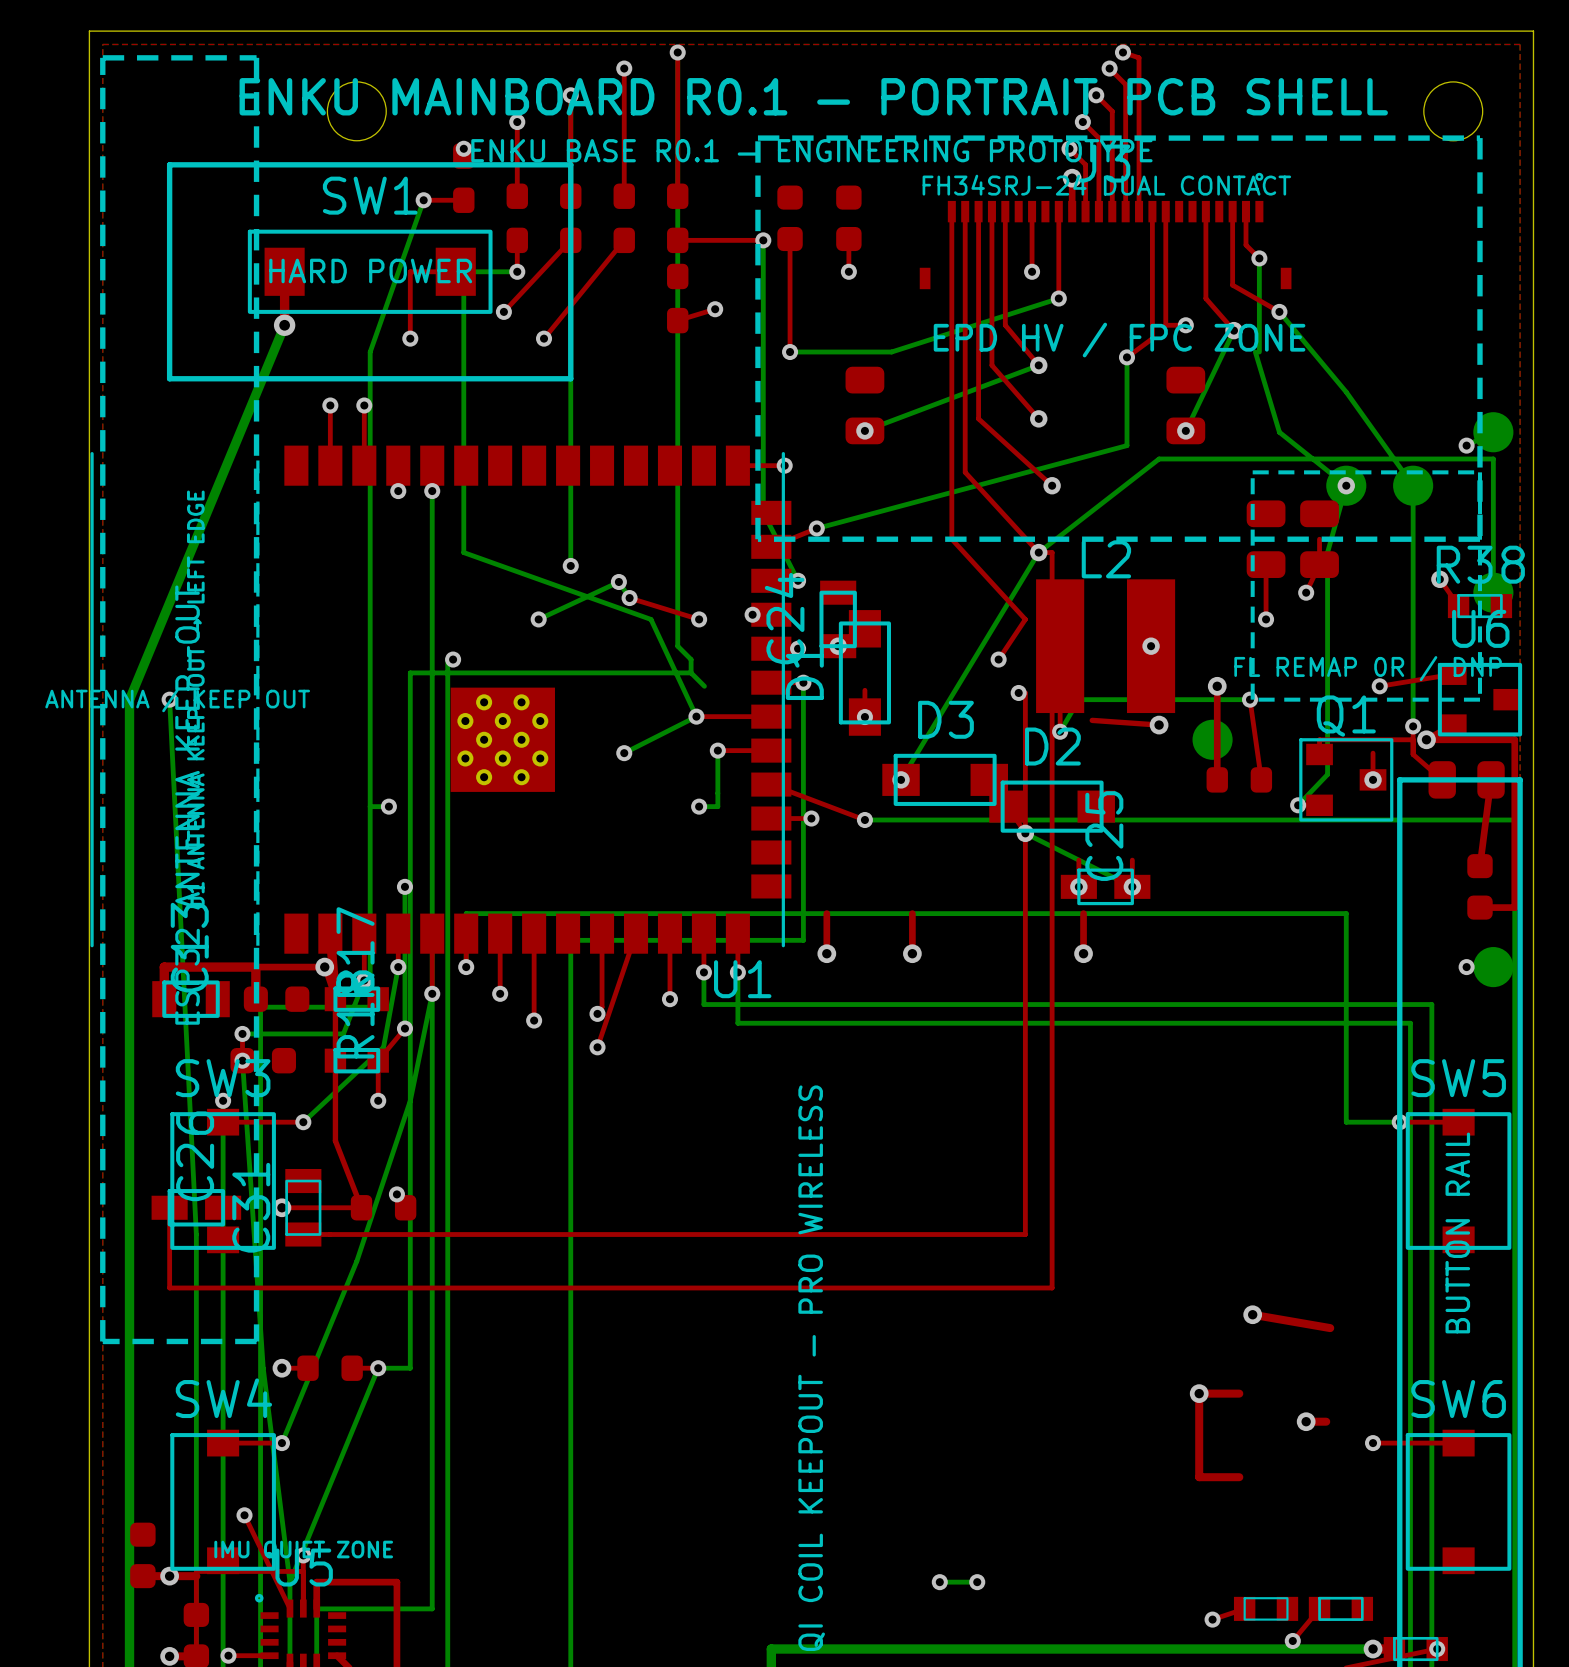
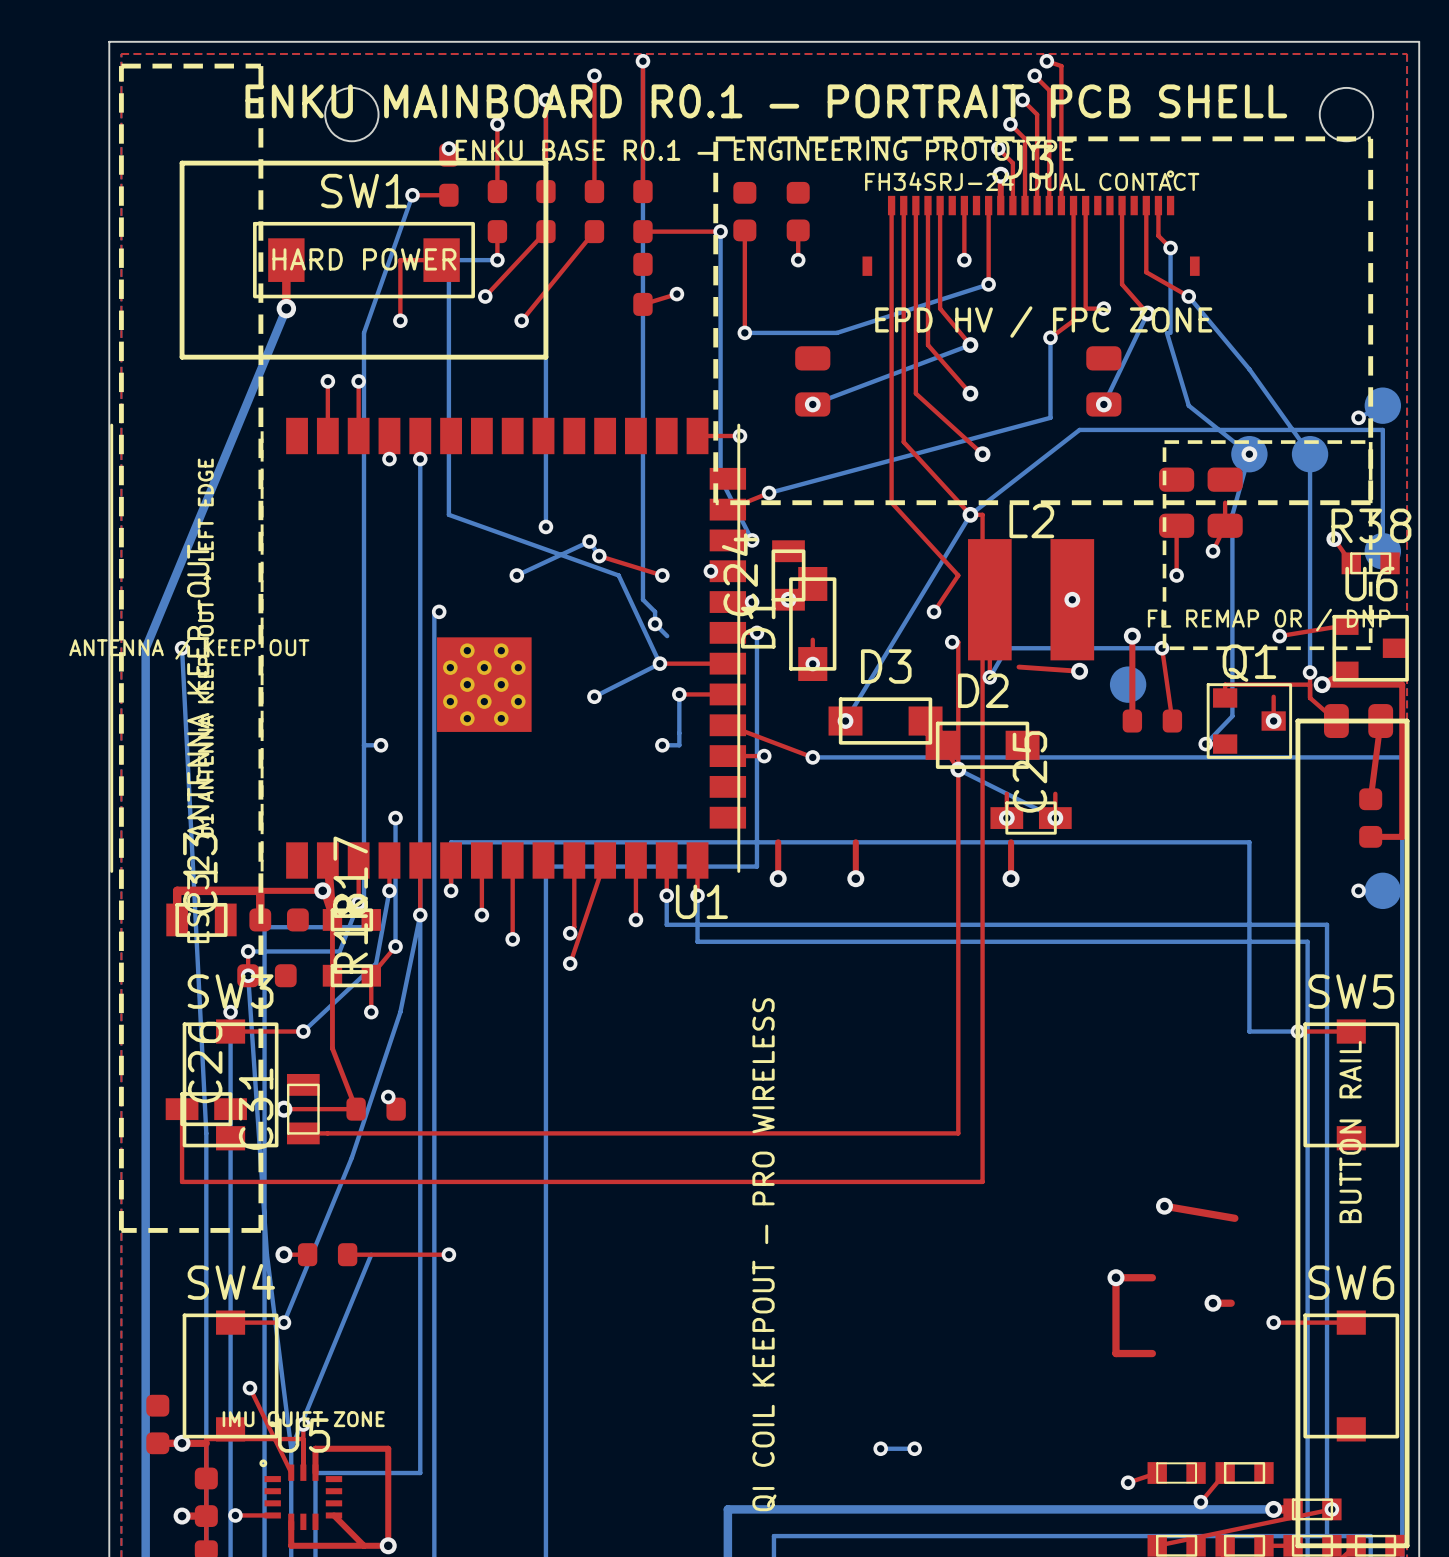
bottom track: (691, 672) (410, 672) (410, 1368) (378, 1368) -> none
via: none -> (655, 623)
top track: none -> (371, 1254) (448, 1254)
via: (378, 1368) -> none
via: none -> (448, 1254)

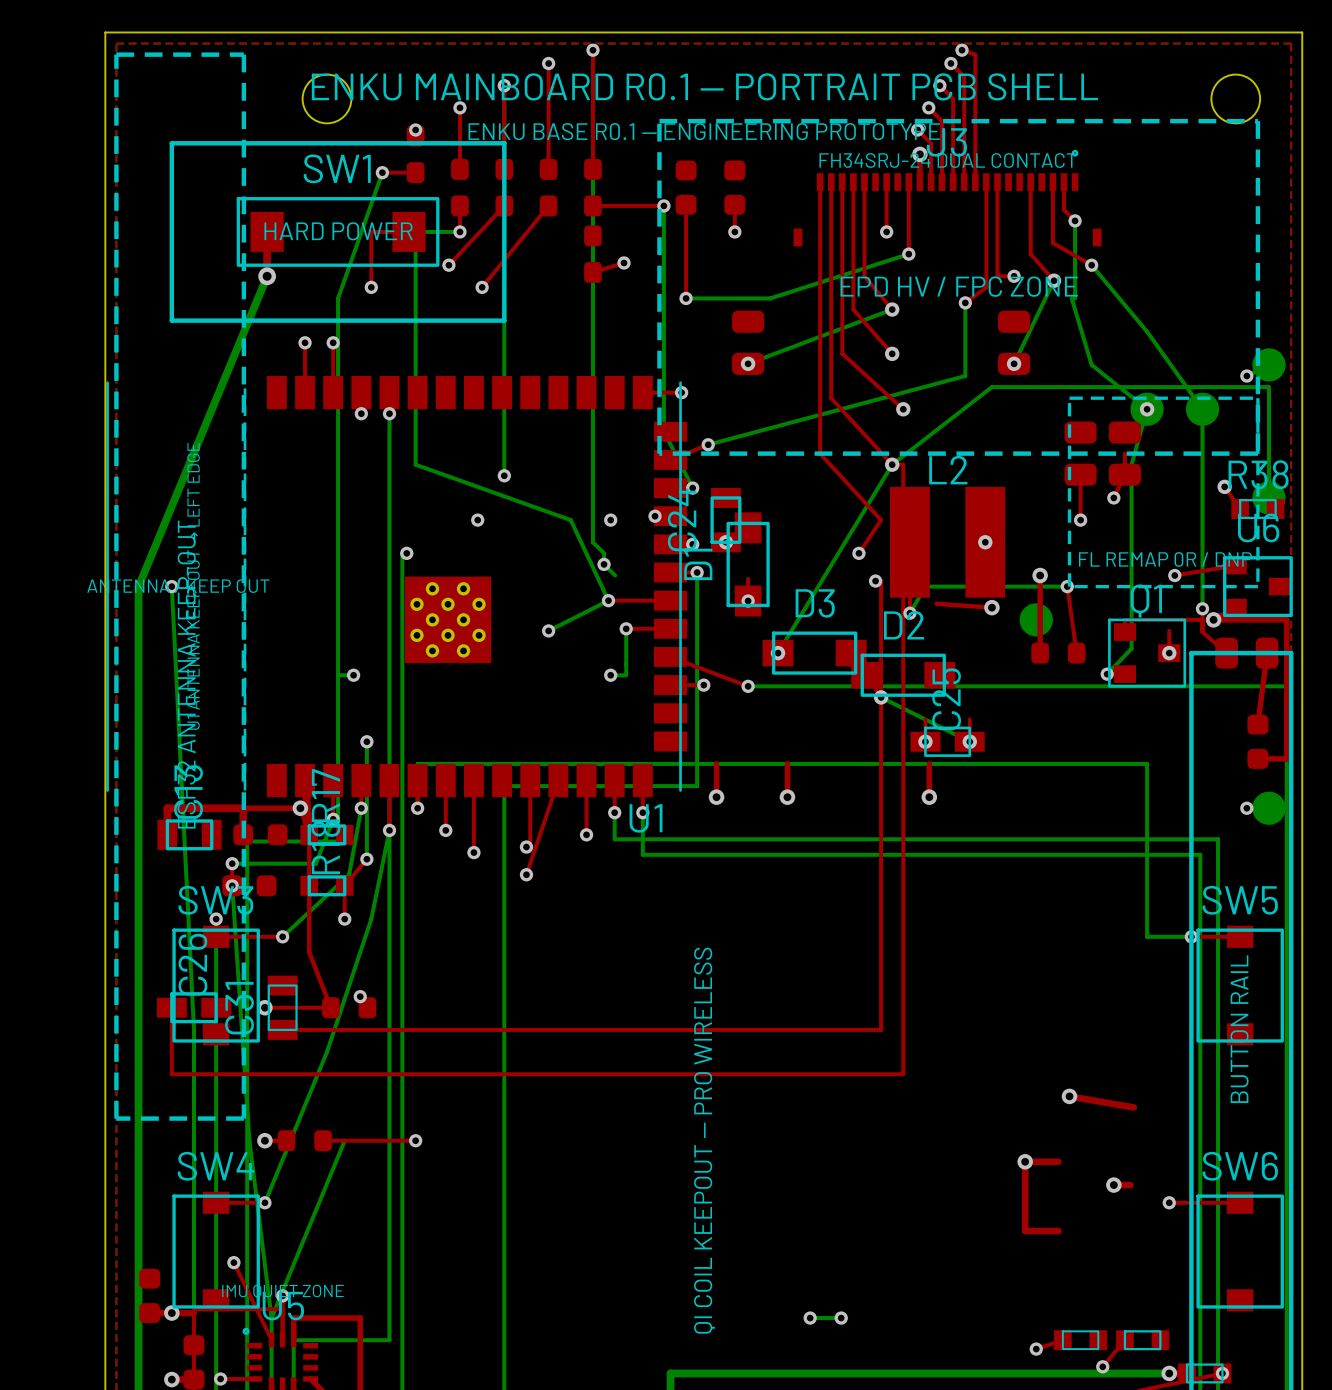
via: (589, 541) -> none
top track: (599, 556) (662, 575) -> none
bottom track: (599, 556) (589, 541) (516, 575) -> none
via: (599, 556) -> none

